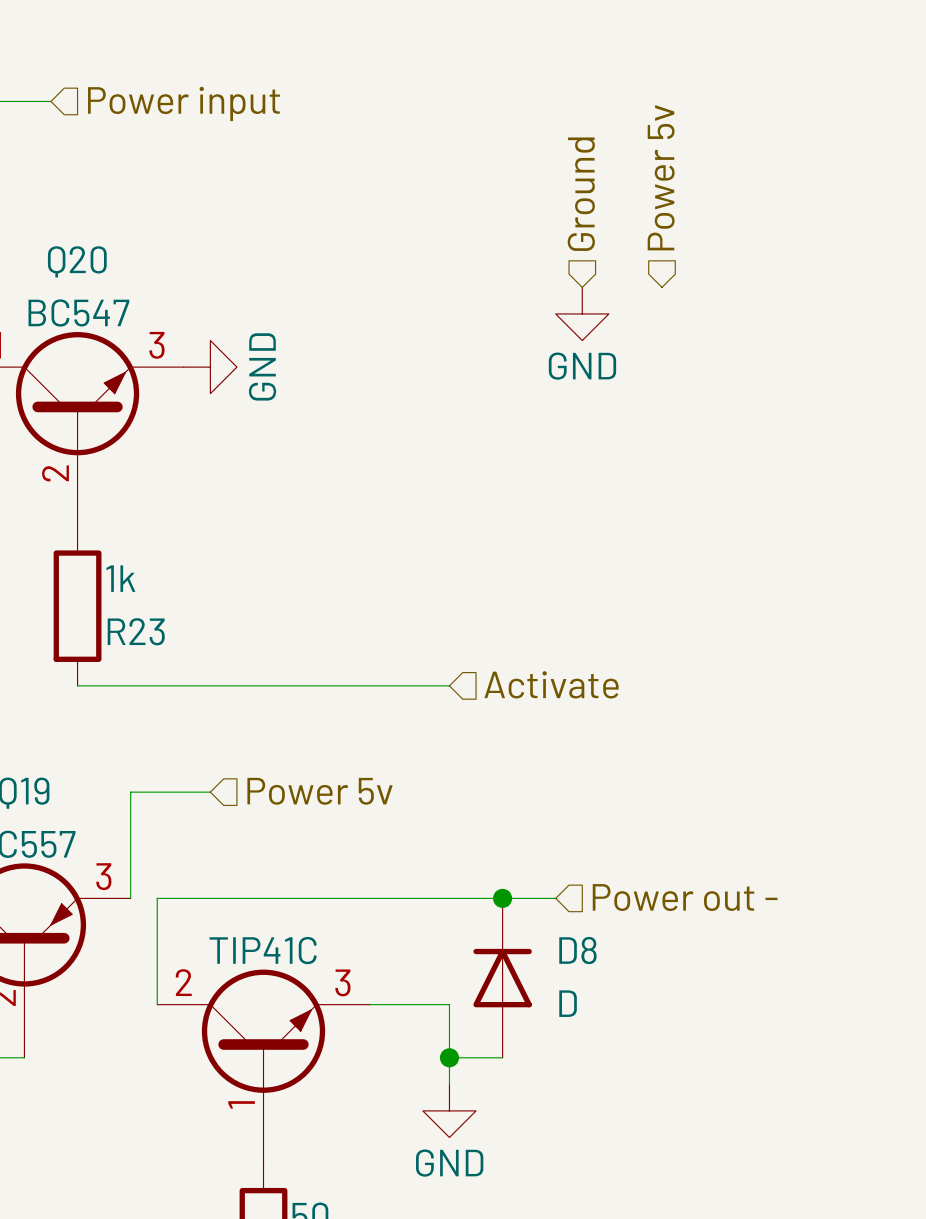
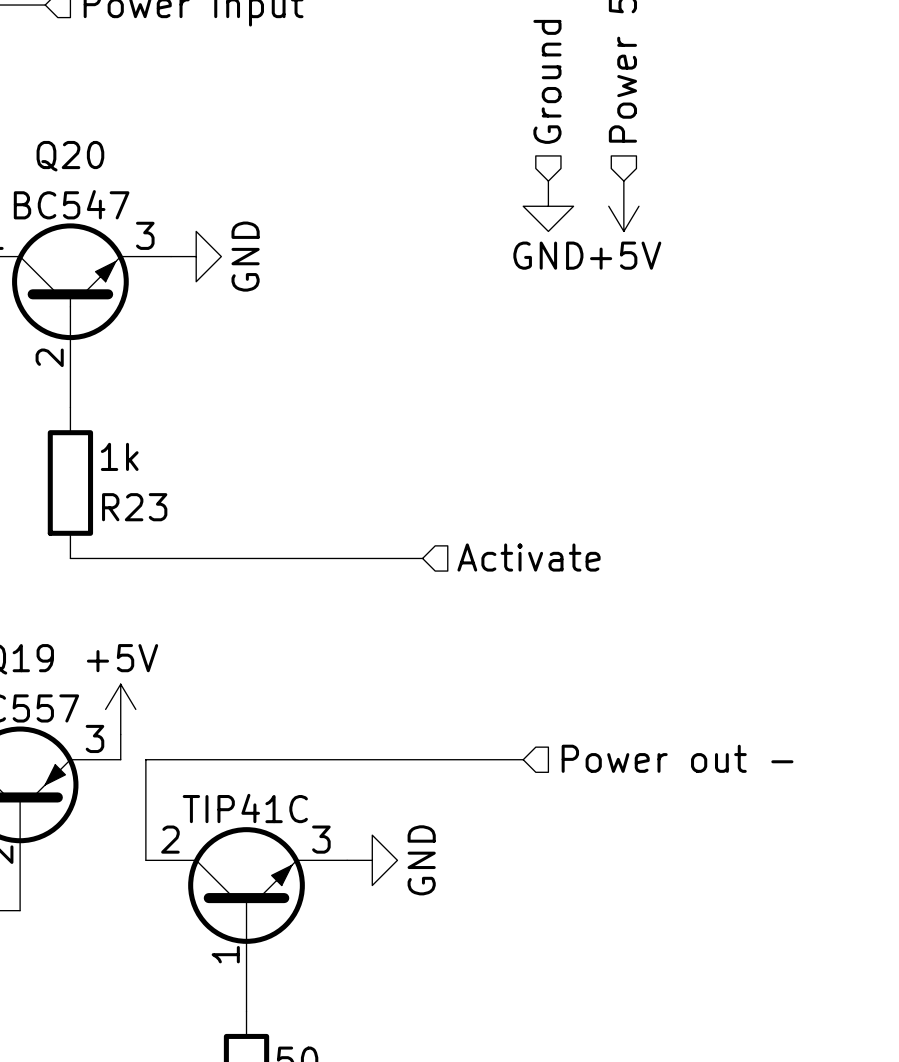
power symbol: none -> +5V (623, 206)
hierarchical label: Power 5v (320, 791) -> none
wire: (210, 792) (130, 792) (130, 871) -> none
power symbol: none -> +5V (120, 709)
junction: (502, 898) -> none
D8: D (502, 978) -> none
wire: (369, 1004) (449, 1004) (449, 1084) -> none
wire: (449, 1057) (502, 1057) -> none
junction: (449, 1057) -> none
power symbol rotation: 0° (449, 1110) -> 90° counterclockwise (372, 860)
power symbol position: GND (449, 1110) -> GND (372, 860)

